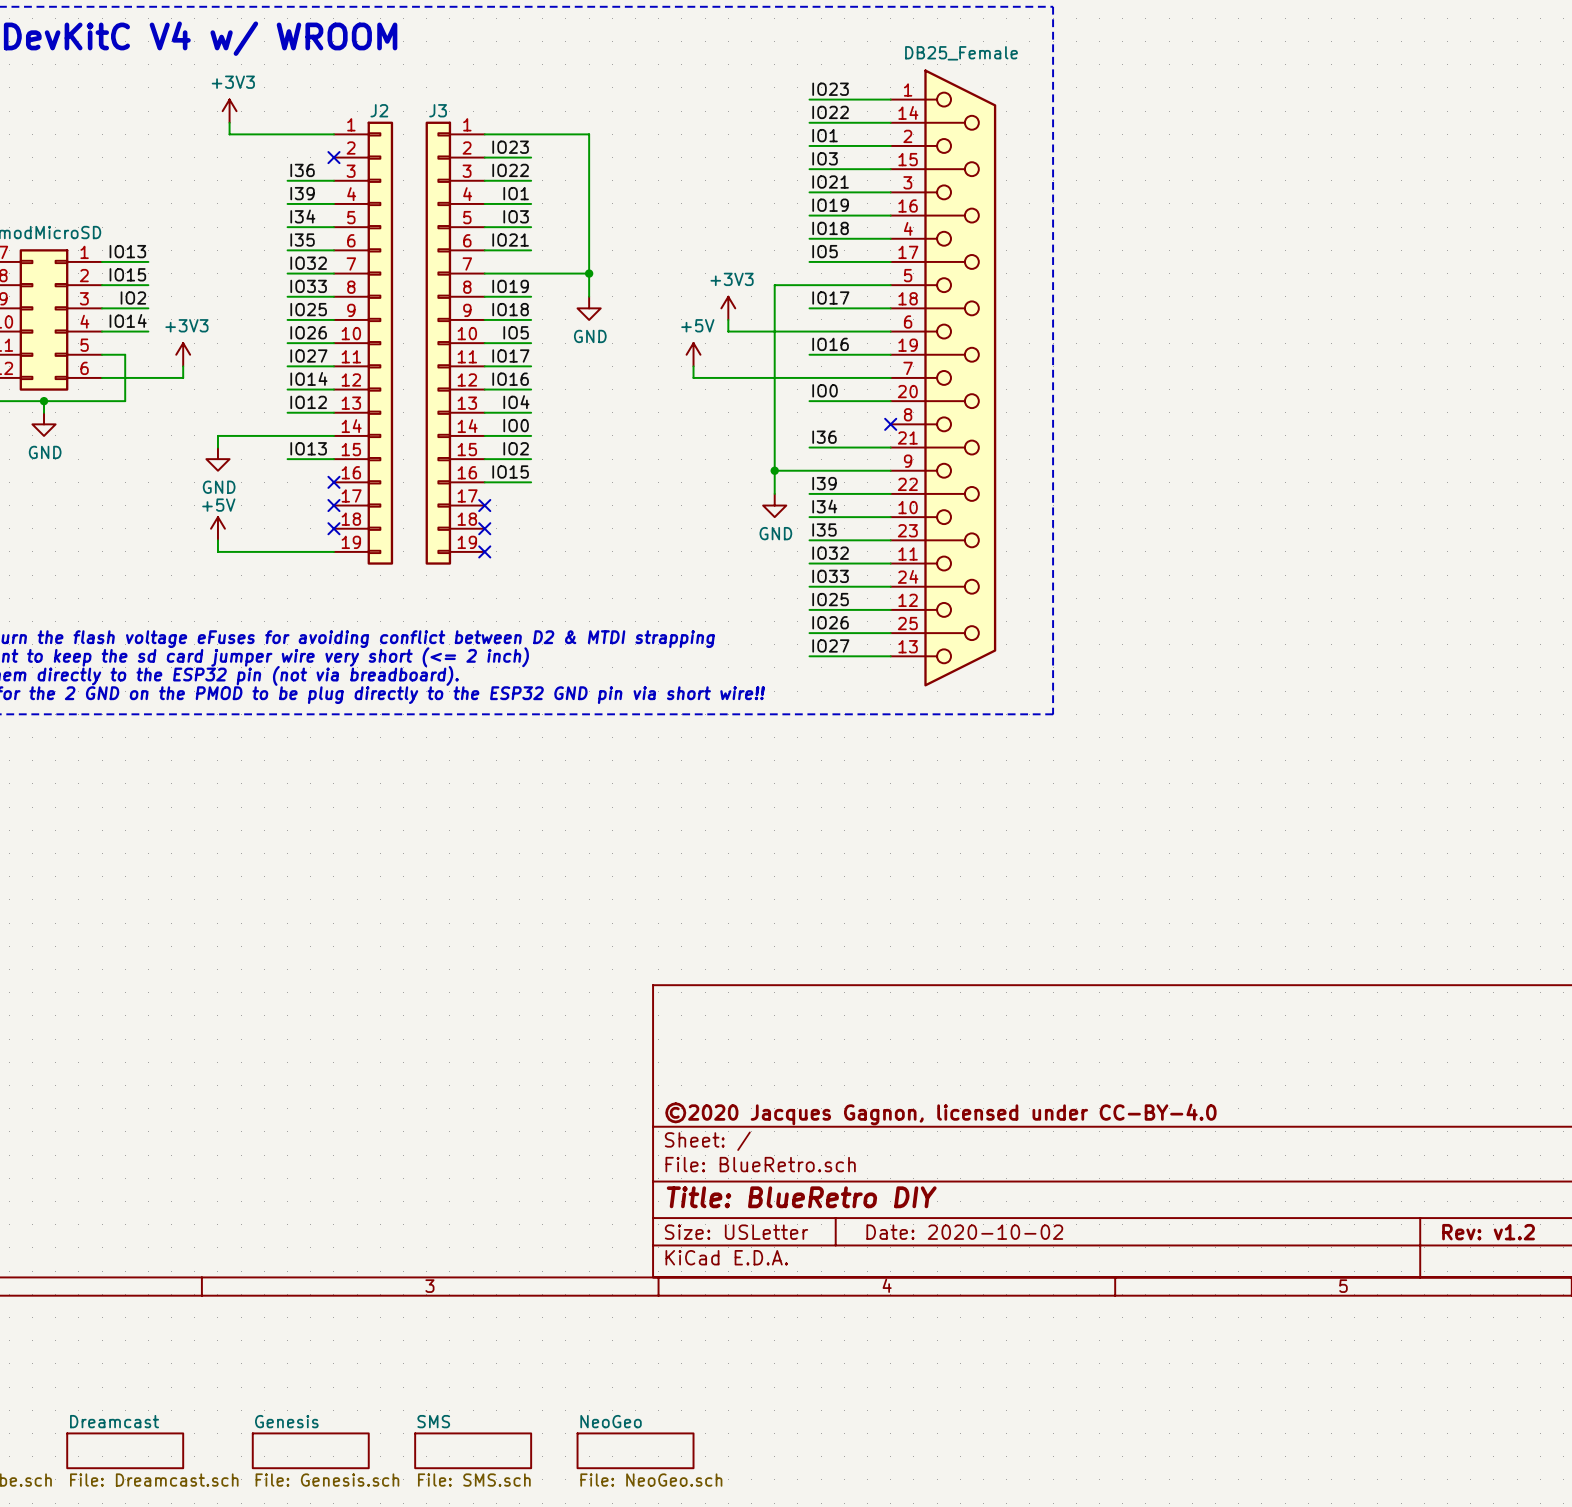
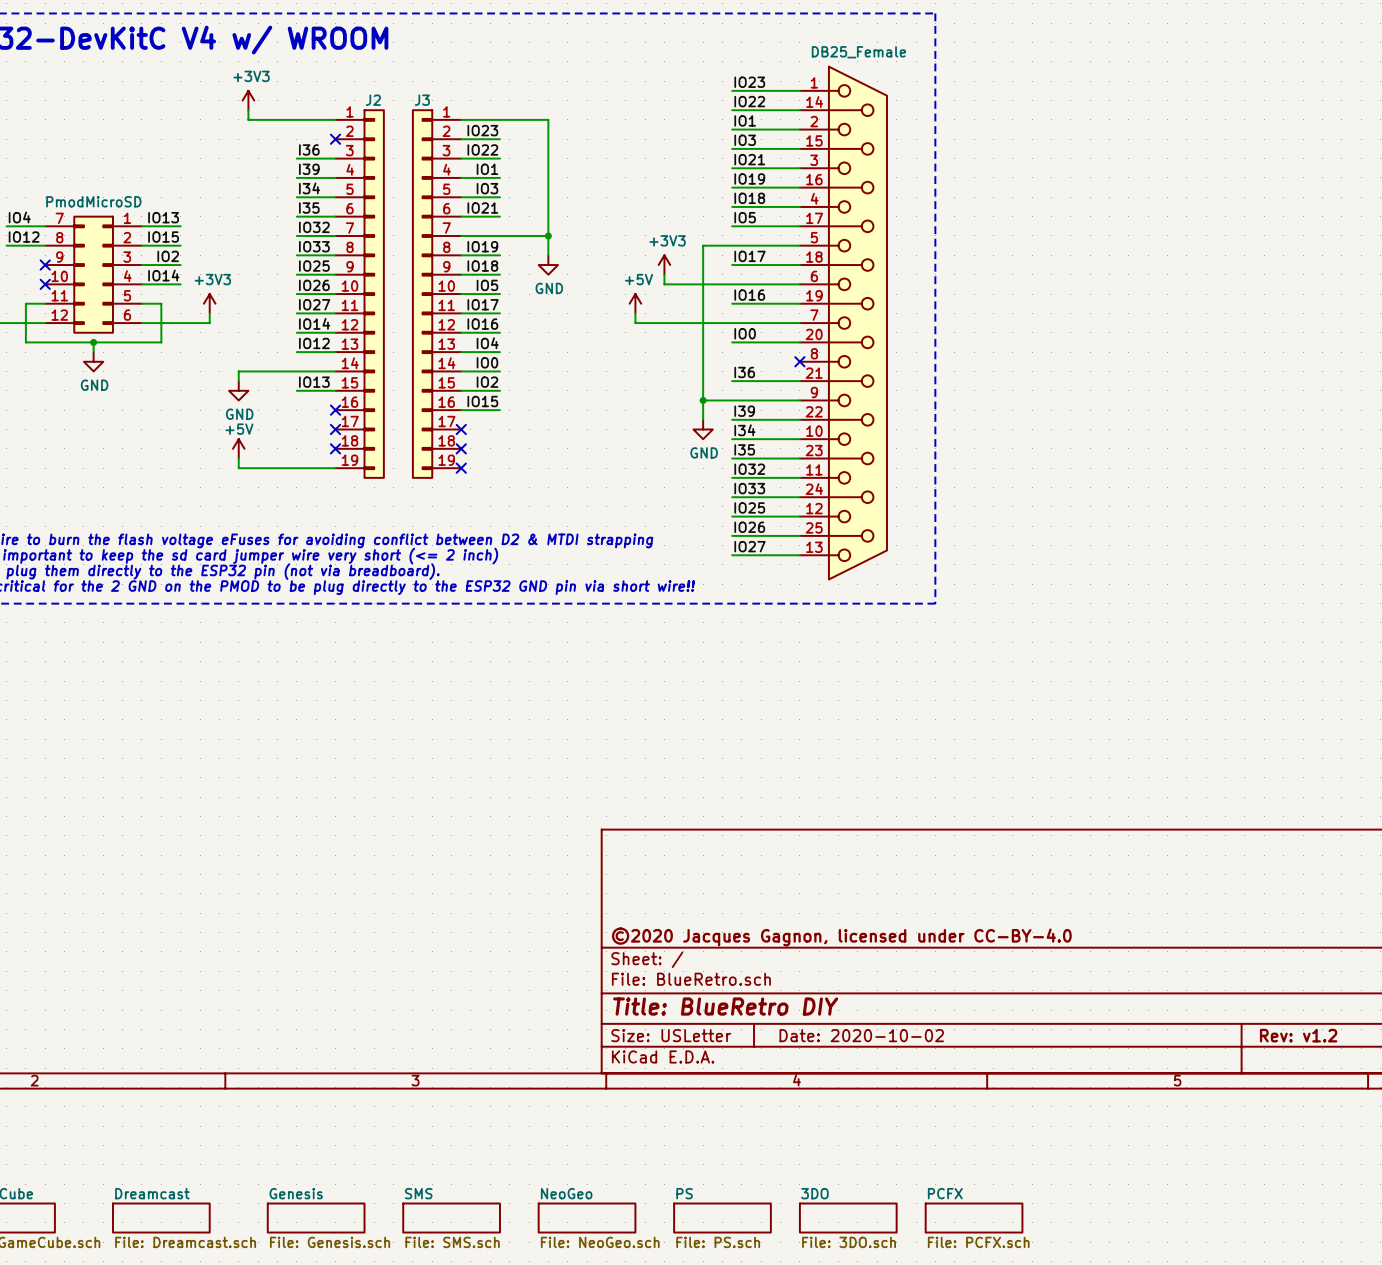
sheet PS: none -> File: PS.sch (722, 1218)
sheet 3DO: none -> File: 3DO.sch (848, 1218)
sheet PCFX: none -> File: PCFX.sch (974, 1218)

